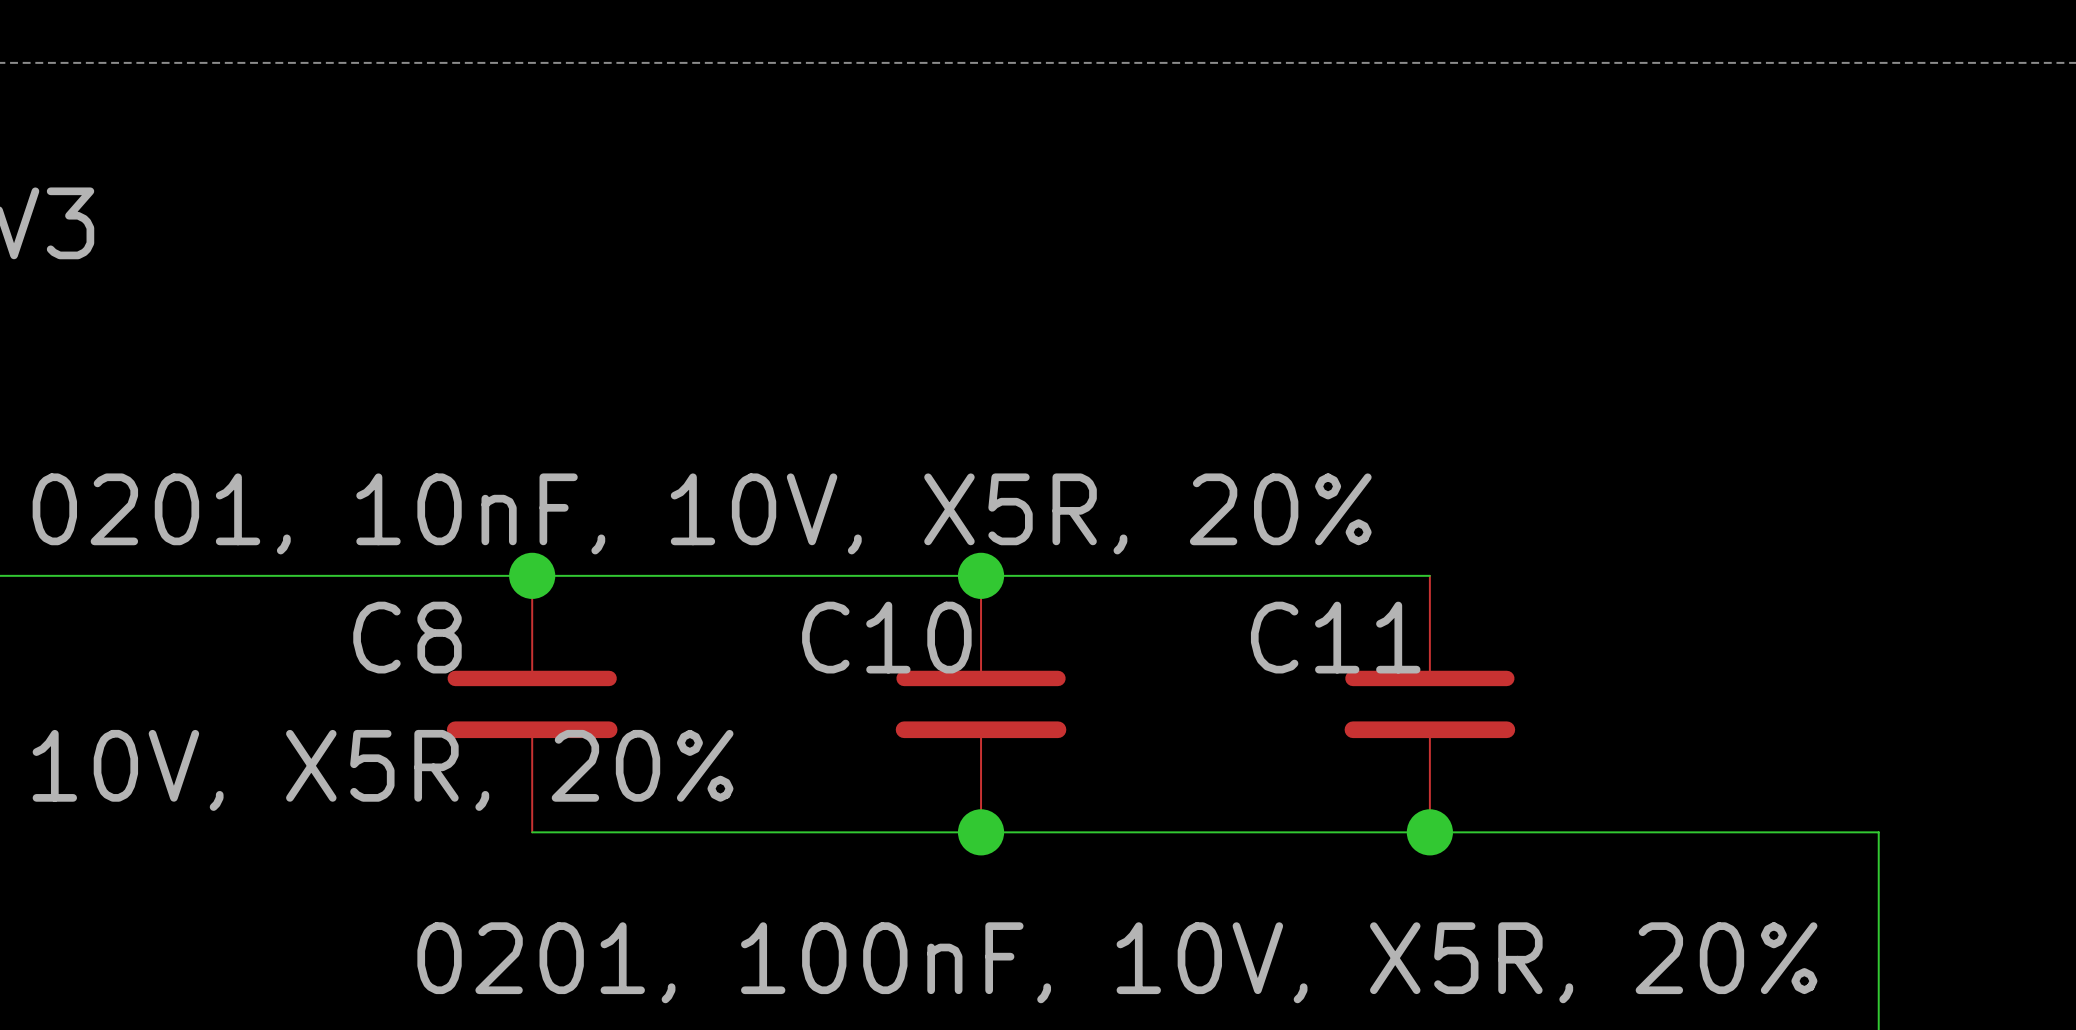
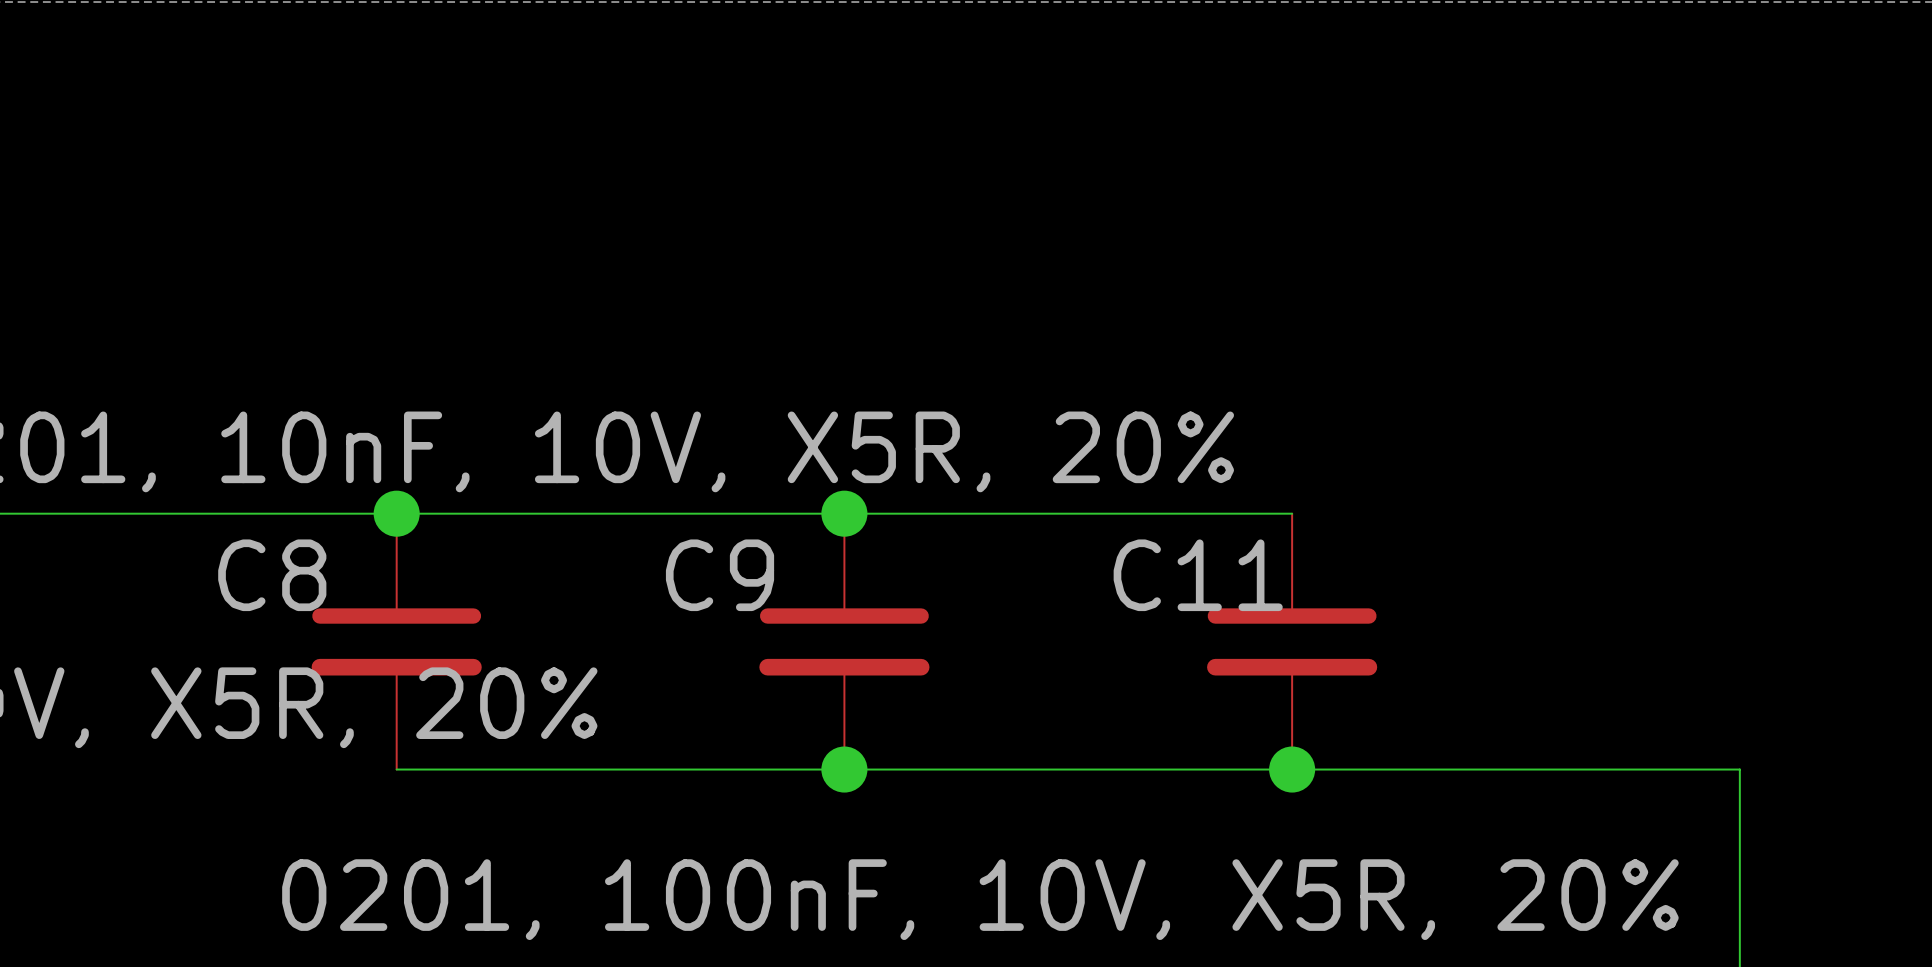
C10 name: C10 (886, 637) -> C9 (720, 575)

